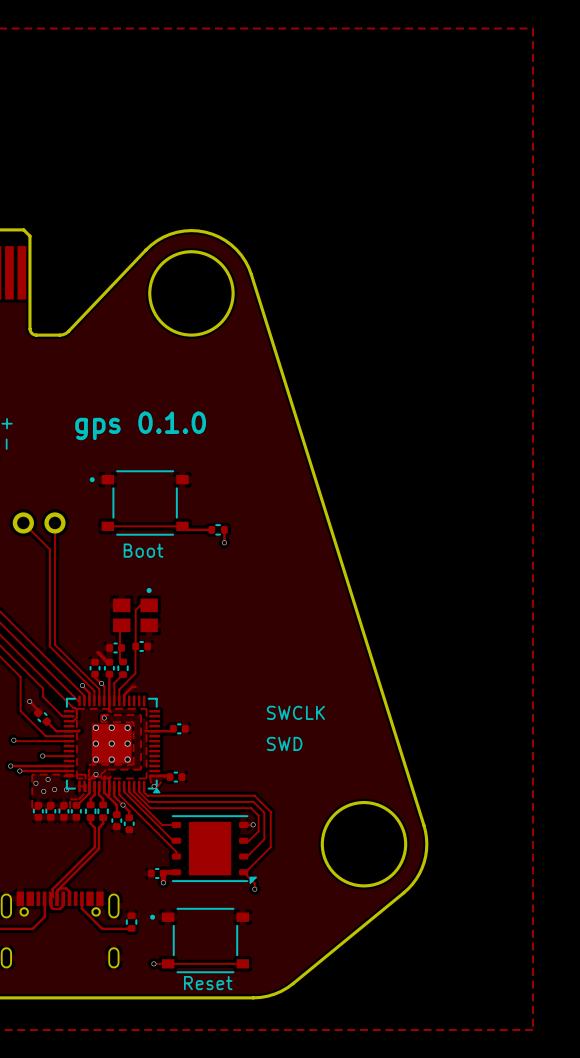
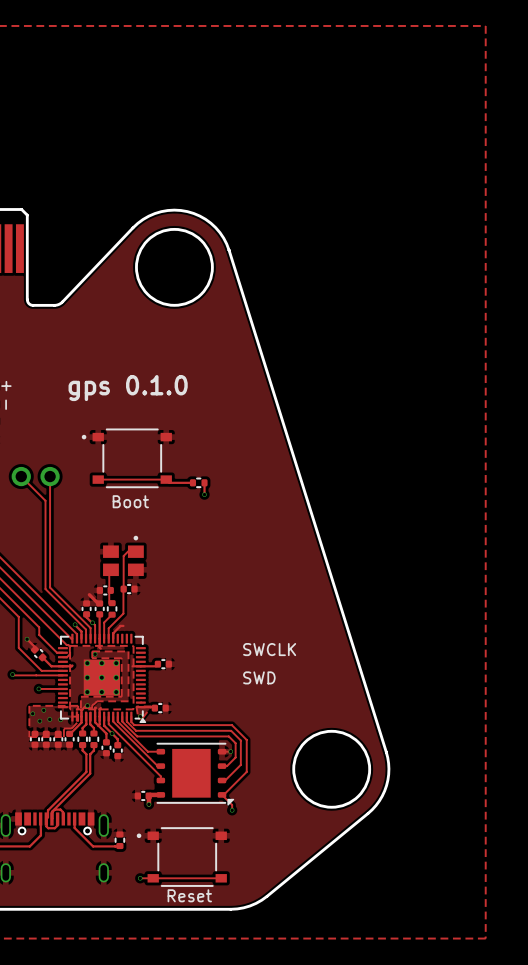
track: (10, 766) (69, 766) -> none
via: (10, 766) -> none
track: (19, 771) (69, 771) -> none
via: (19, 771) -> none

